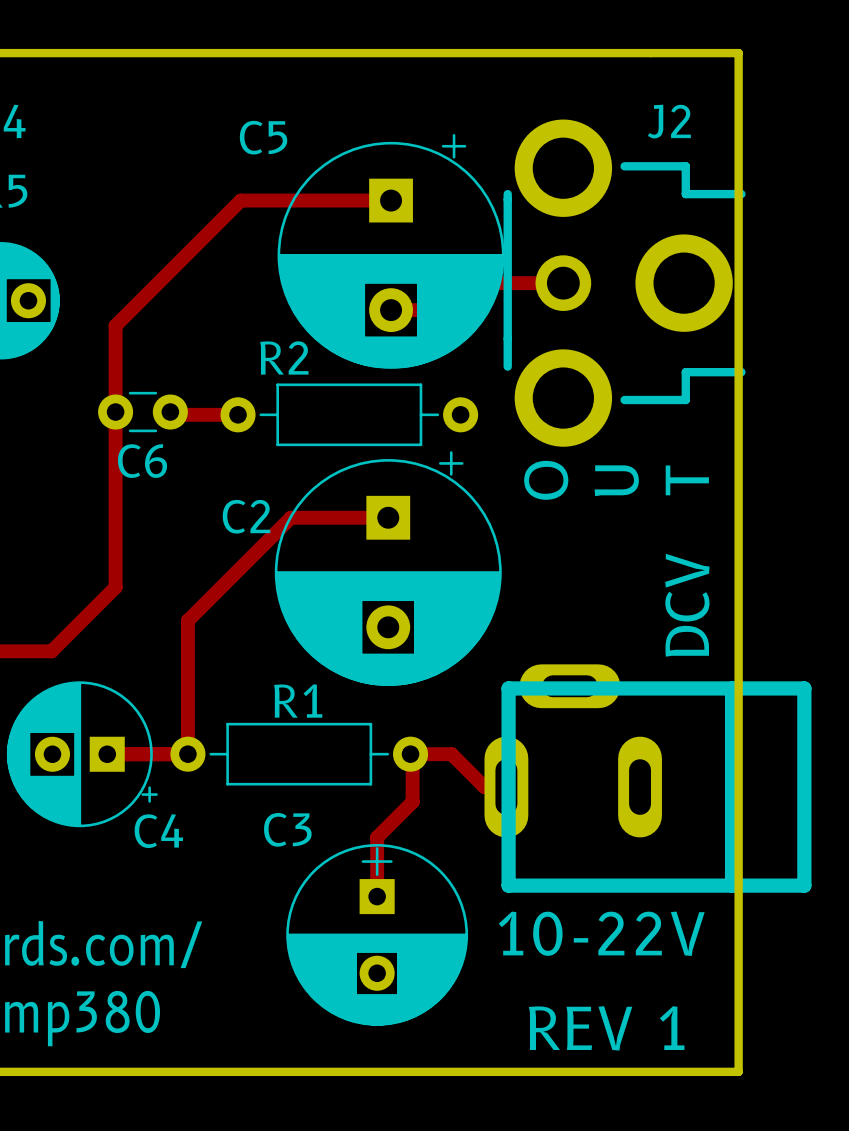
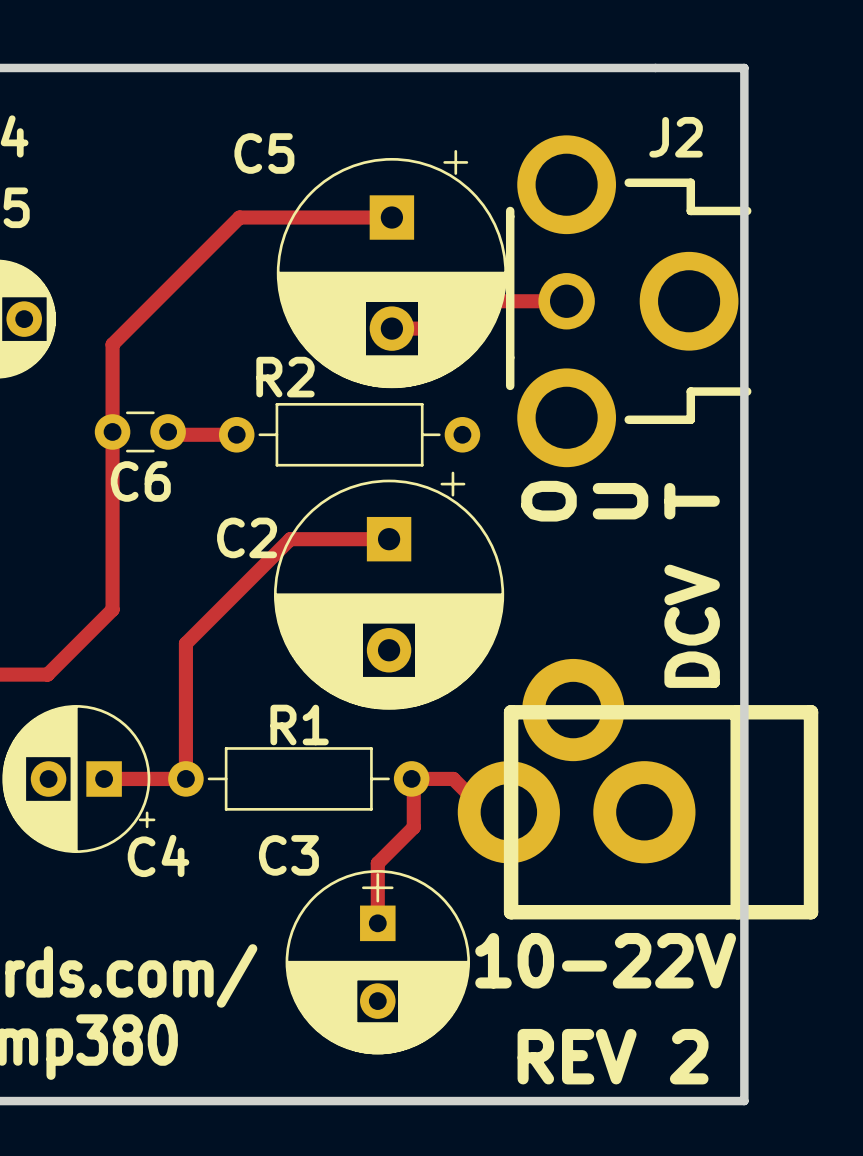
part footprint: [484, 664, 812, 893] -> [457, 658, 819, 920]
text: REV 1 (606, 1028) -> REV 2 (613, 1056)

